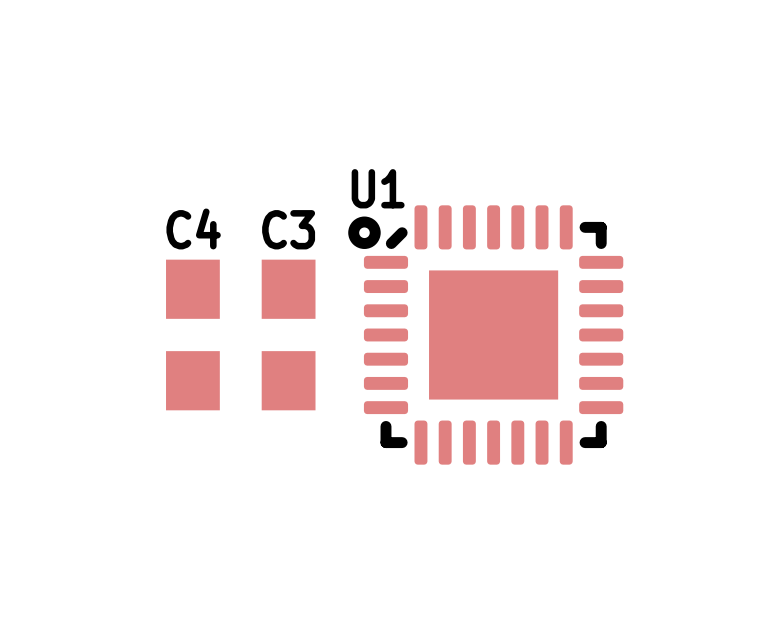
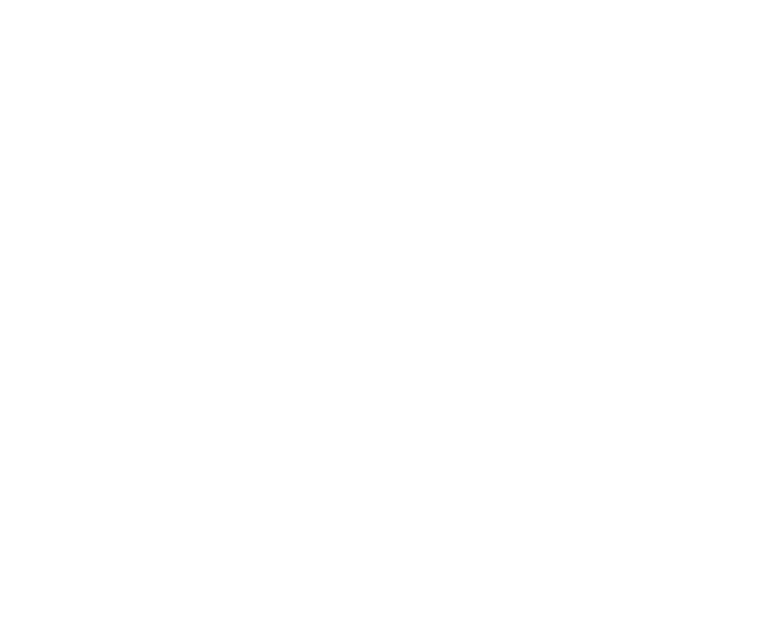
C4: (192, 334) -> none
C3: (288, 334) -> none
U1: (485, 334) -> none

